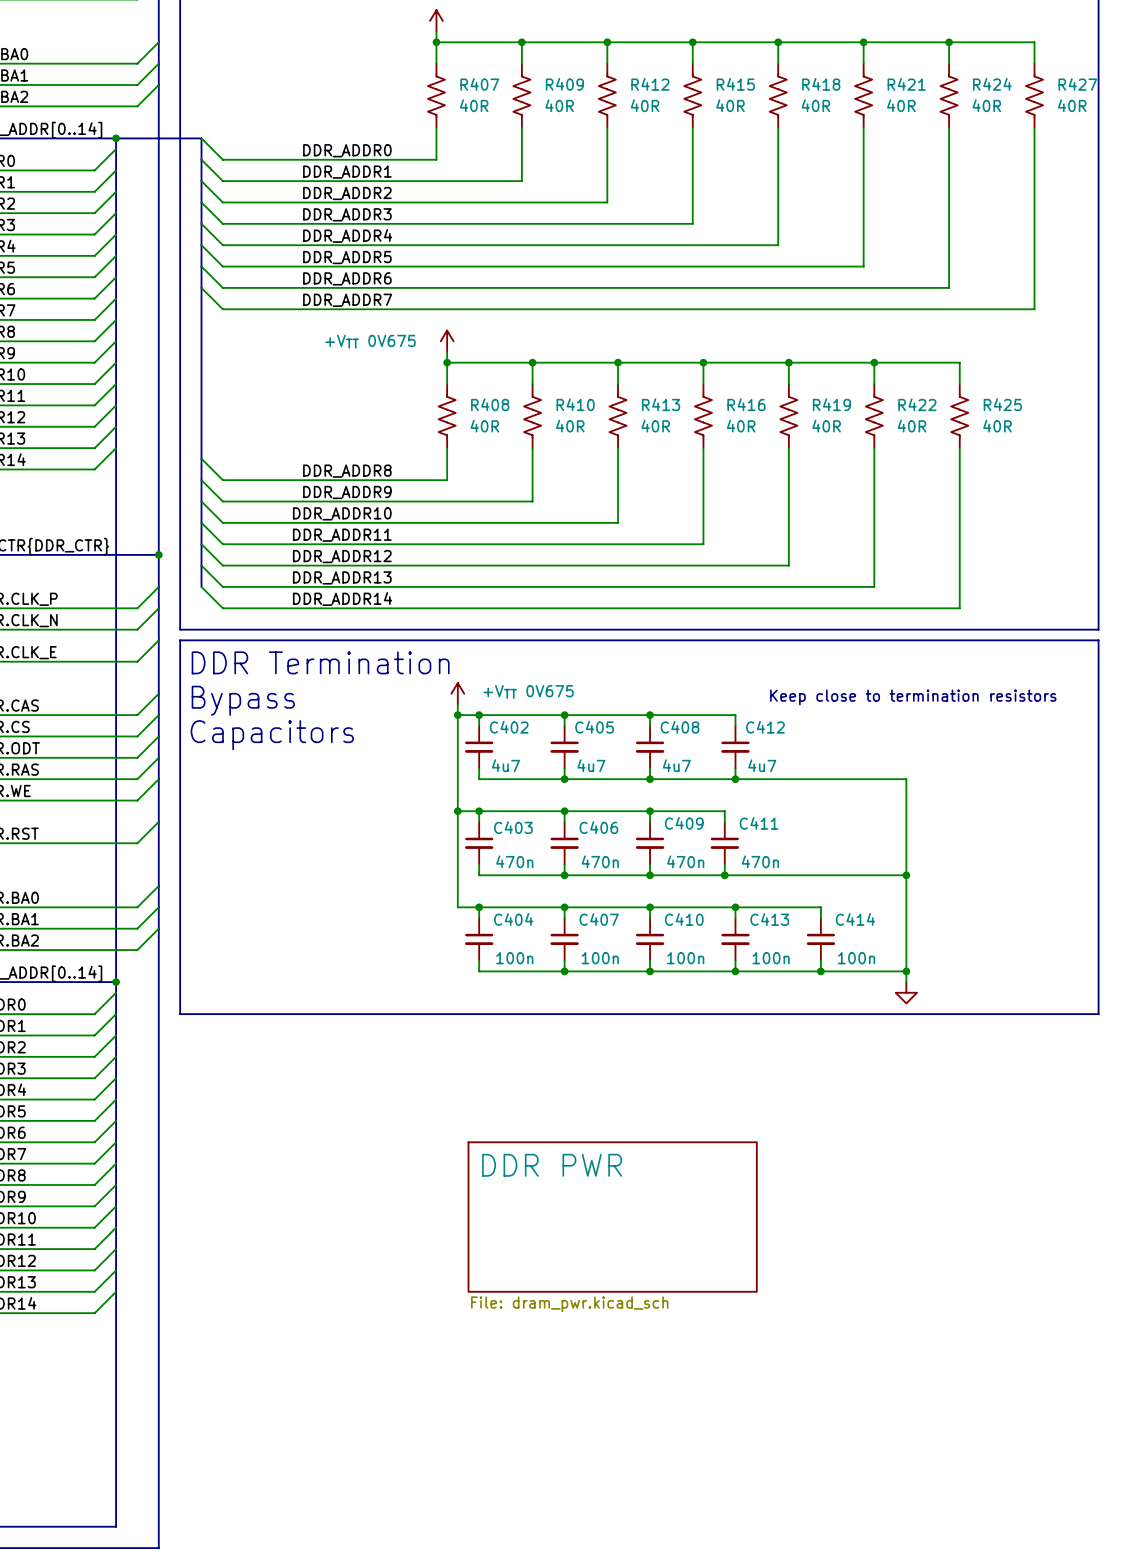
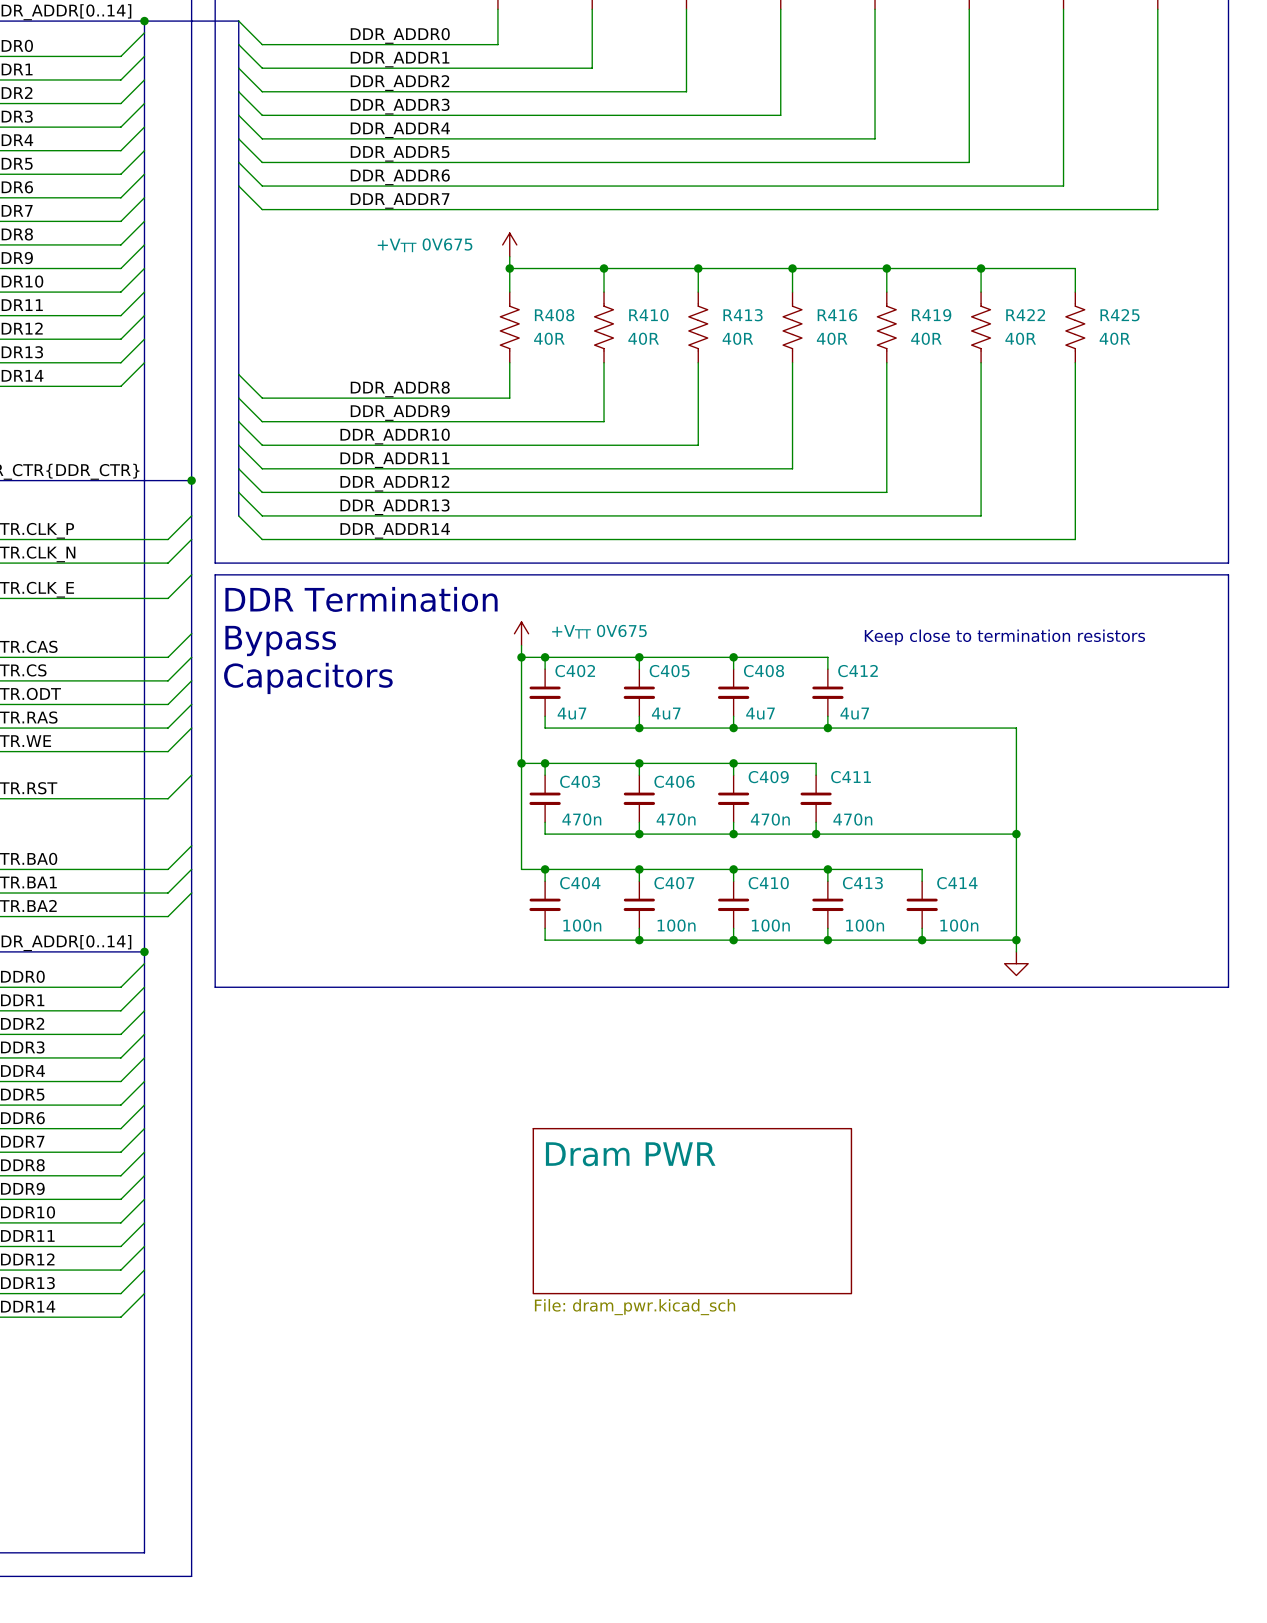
sheet DDR PWR name: DDR PWR (552, 1165) -> Dram PWR (630, 1154)

